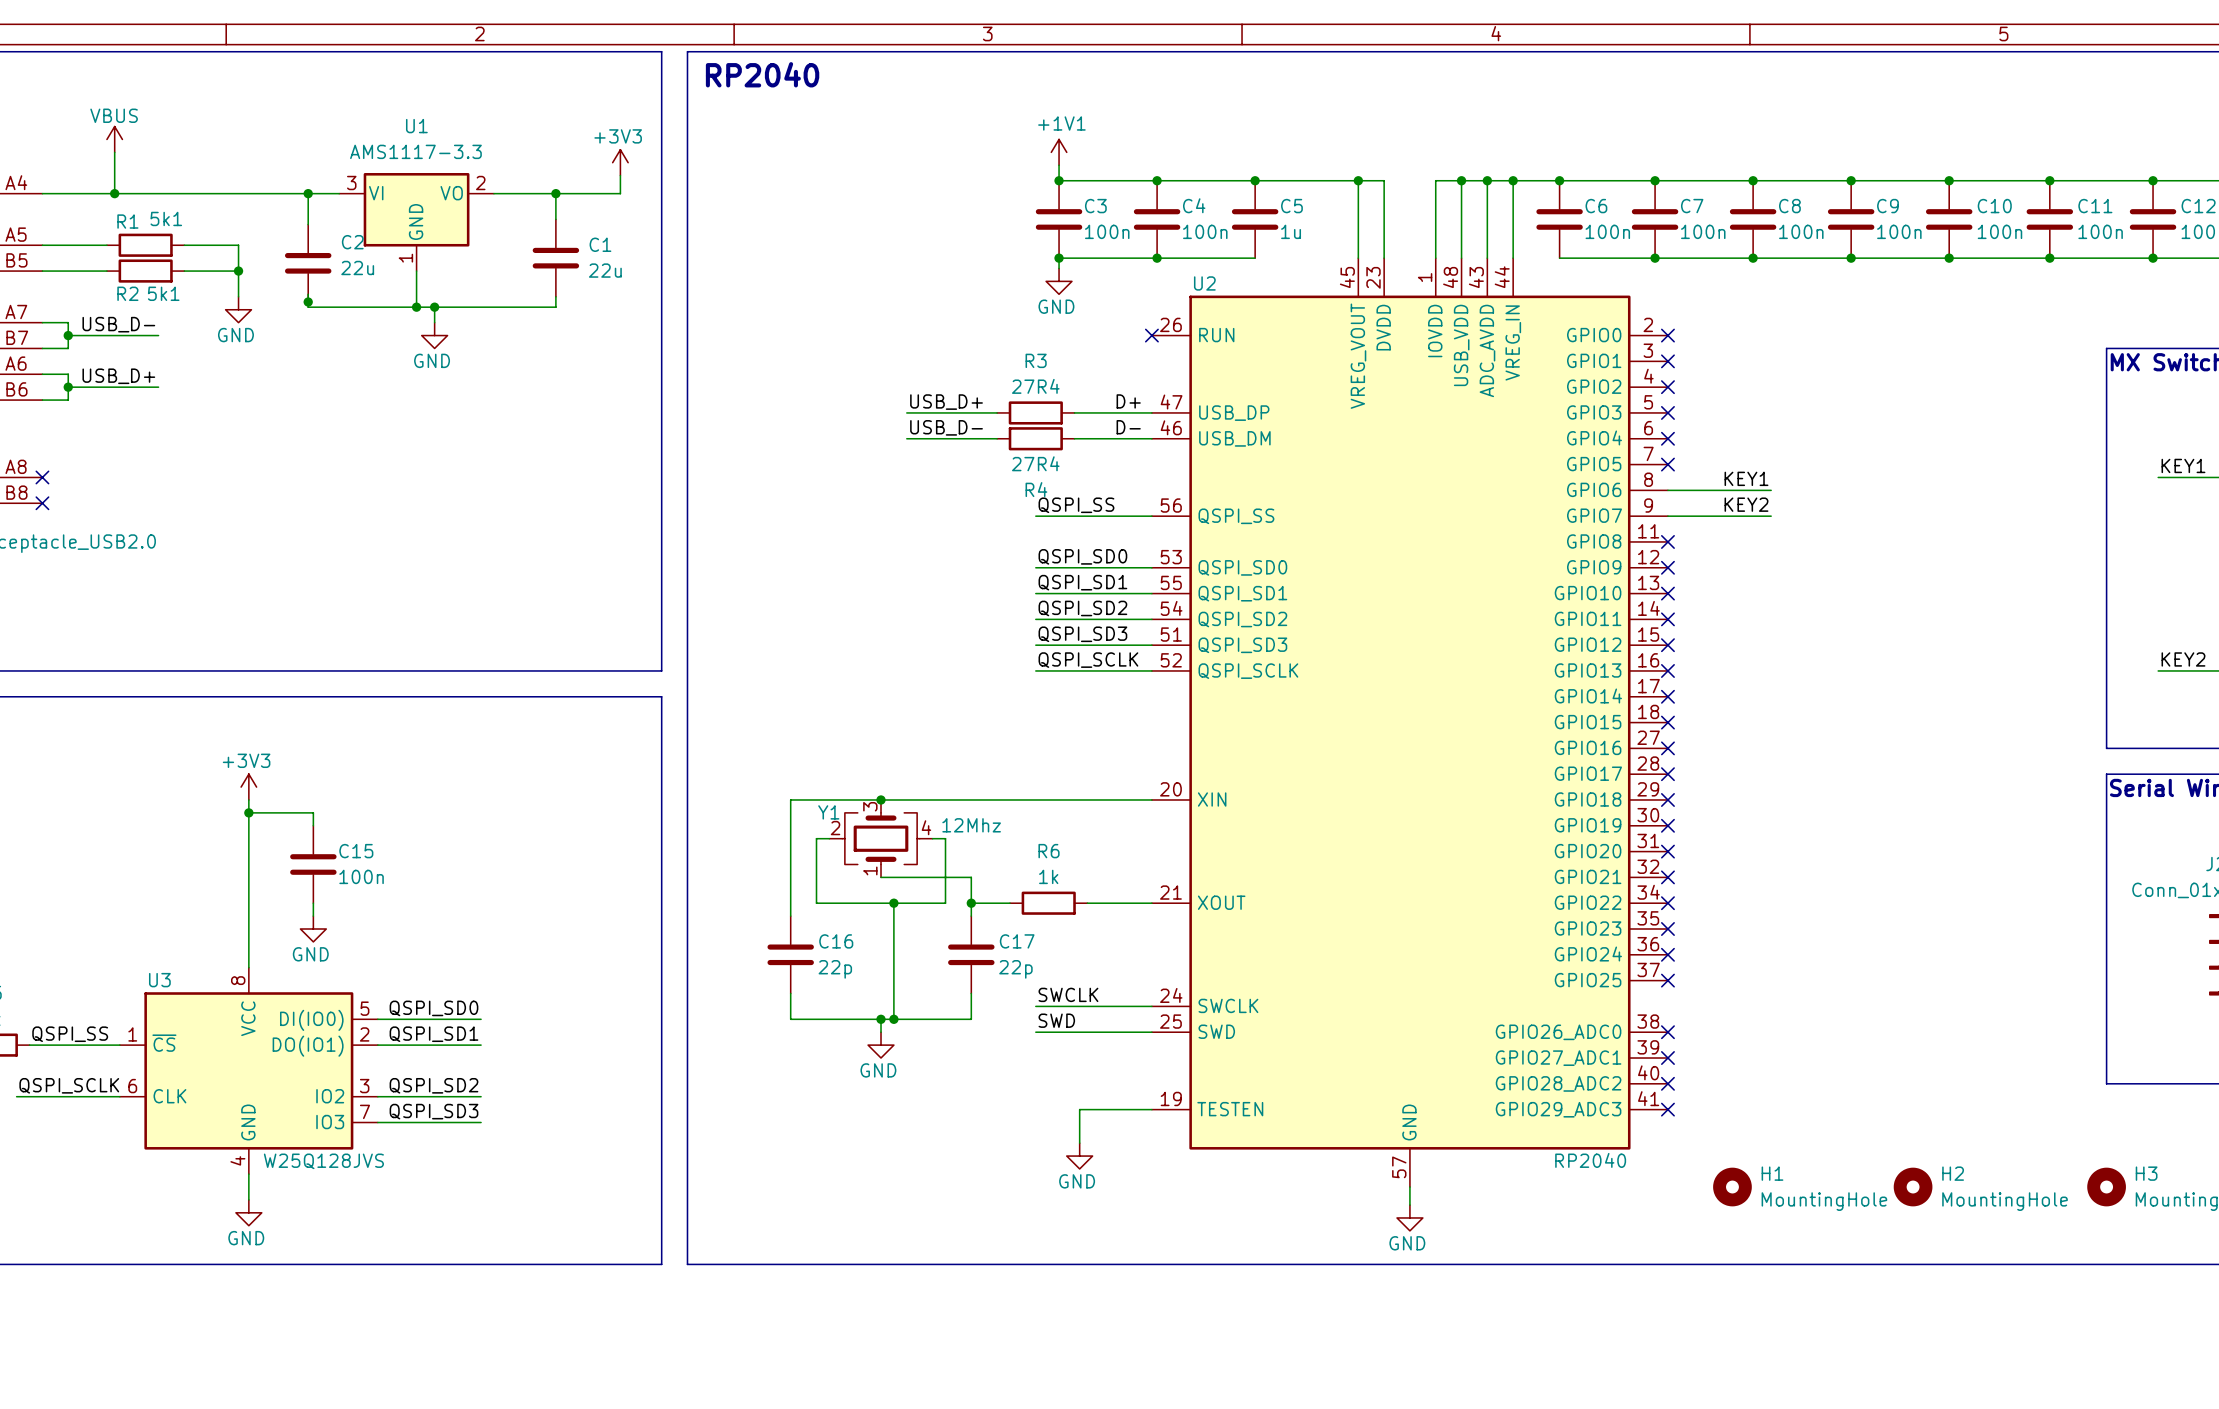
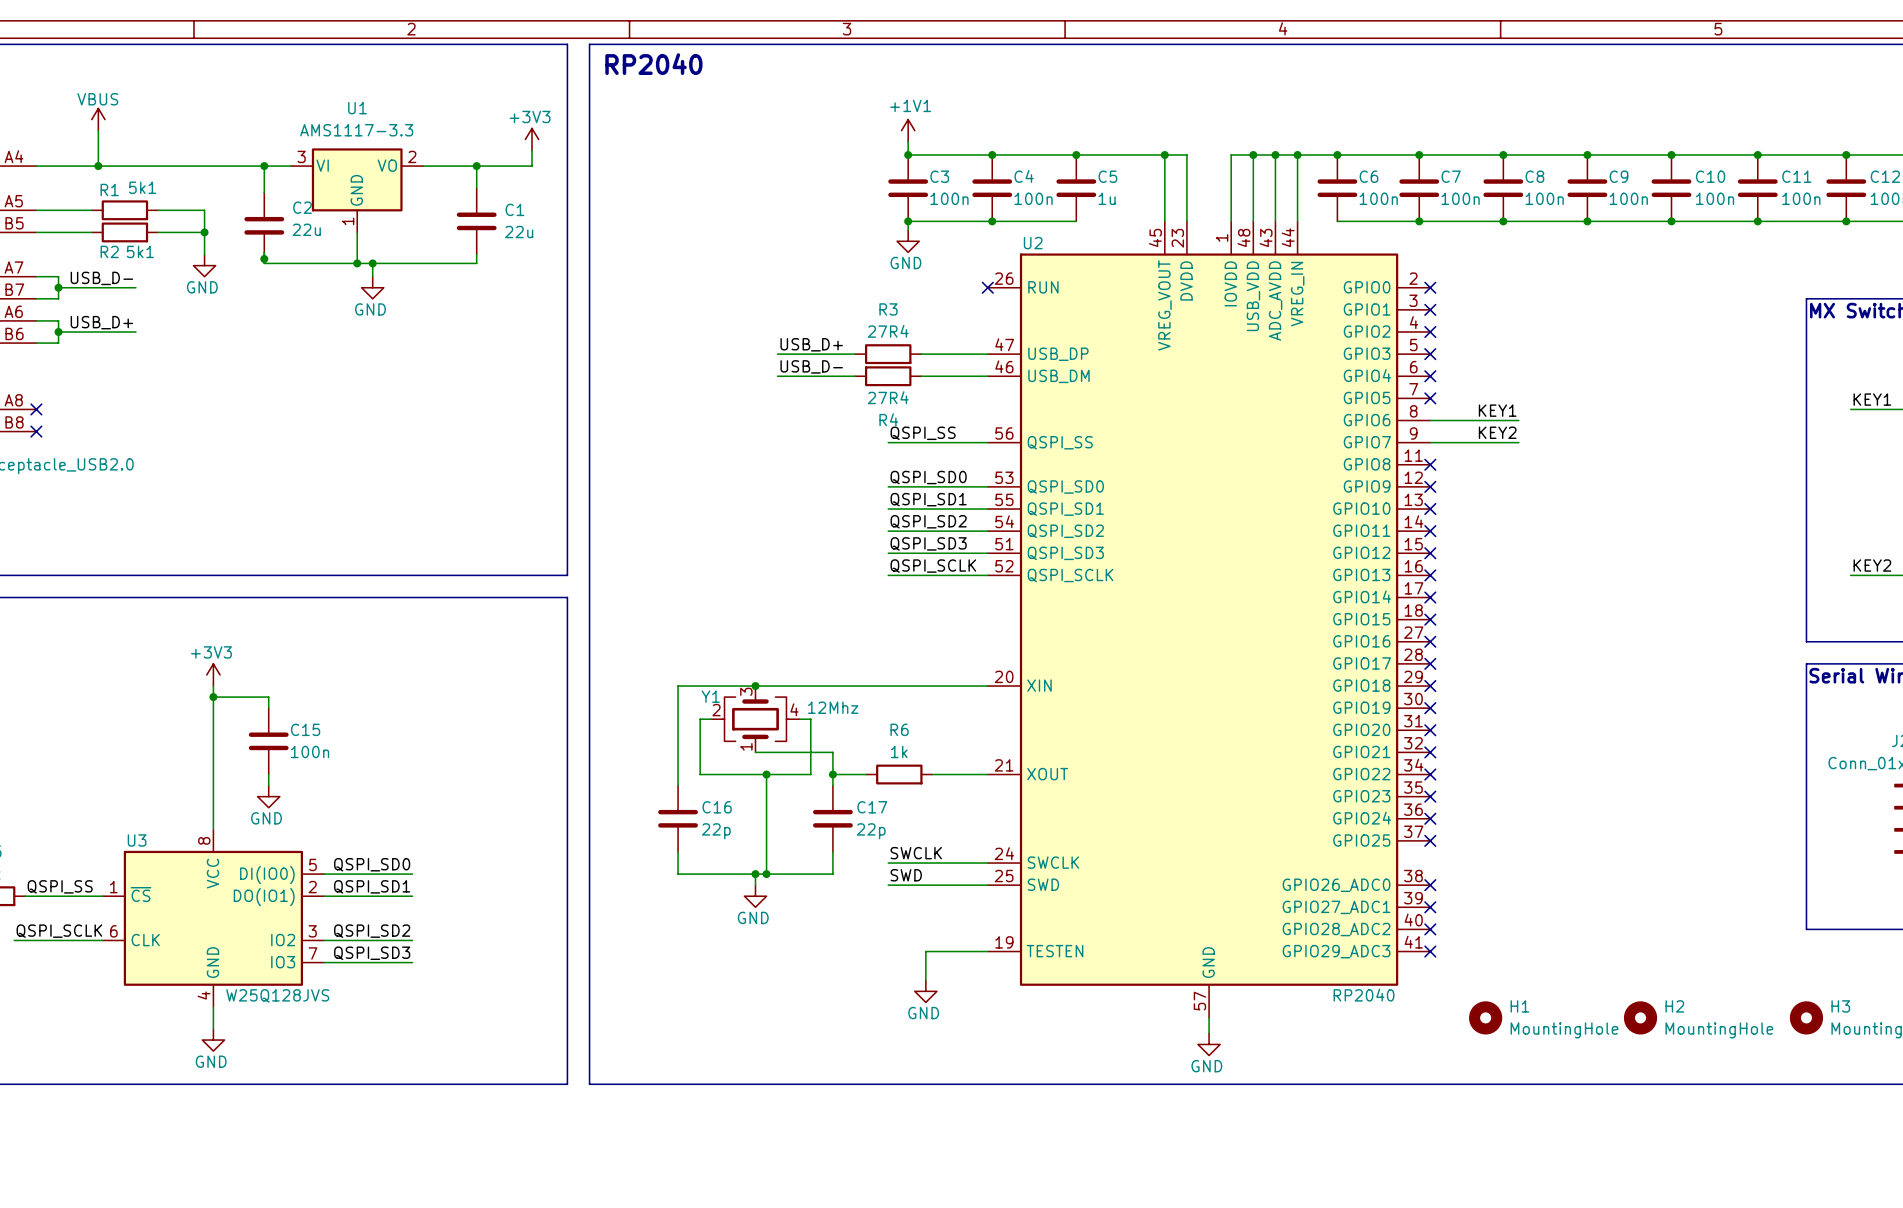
label: D+ (1128, 401) -> none
label: D- (1128, 427) -> none

